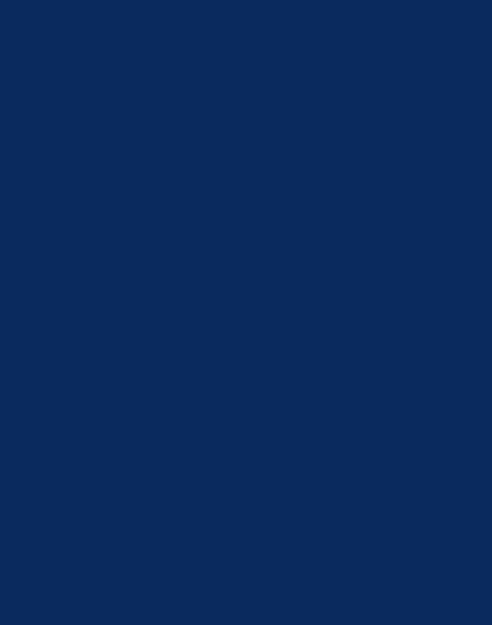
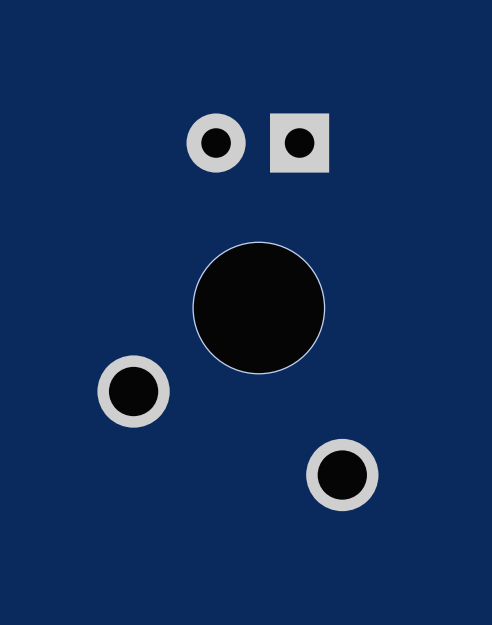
part: none -> (257, 143)
part: none -> (237, 376)

